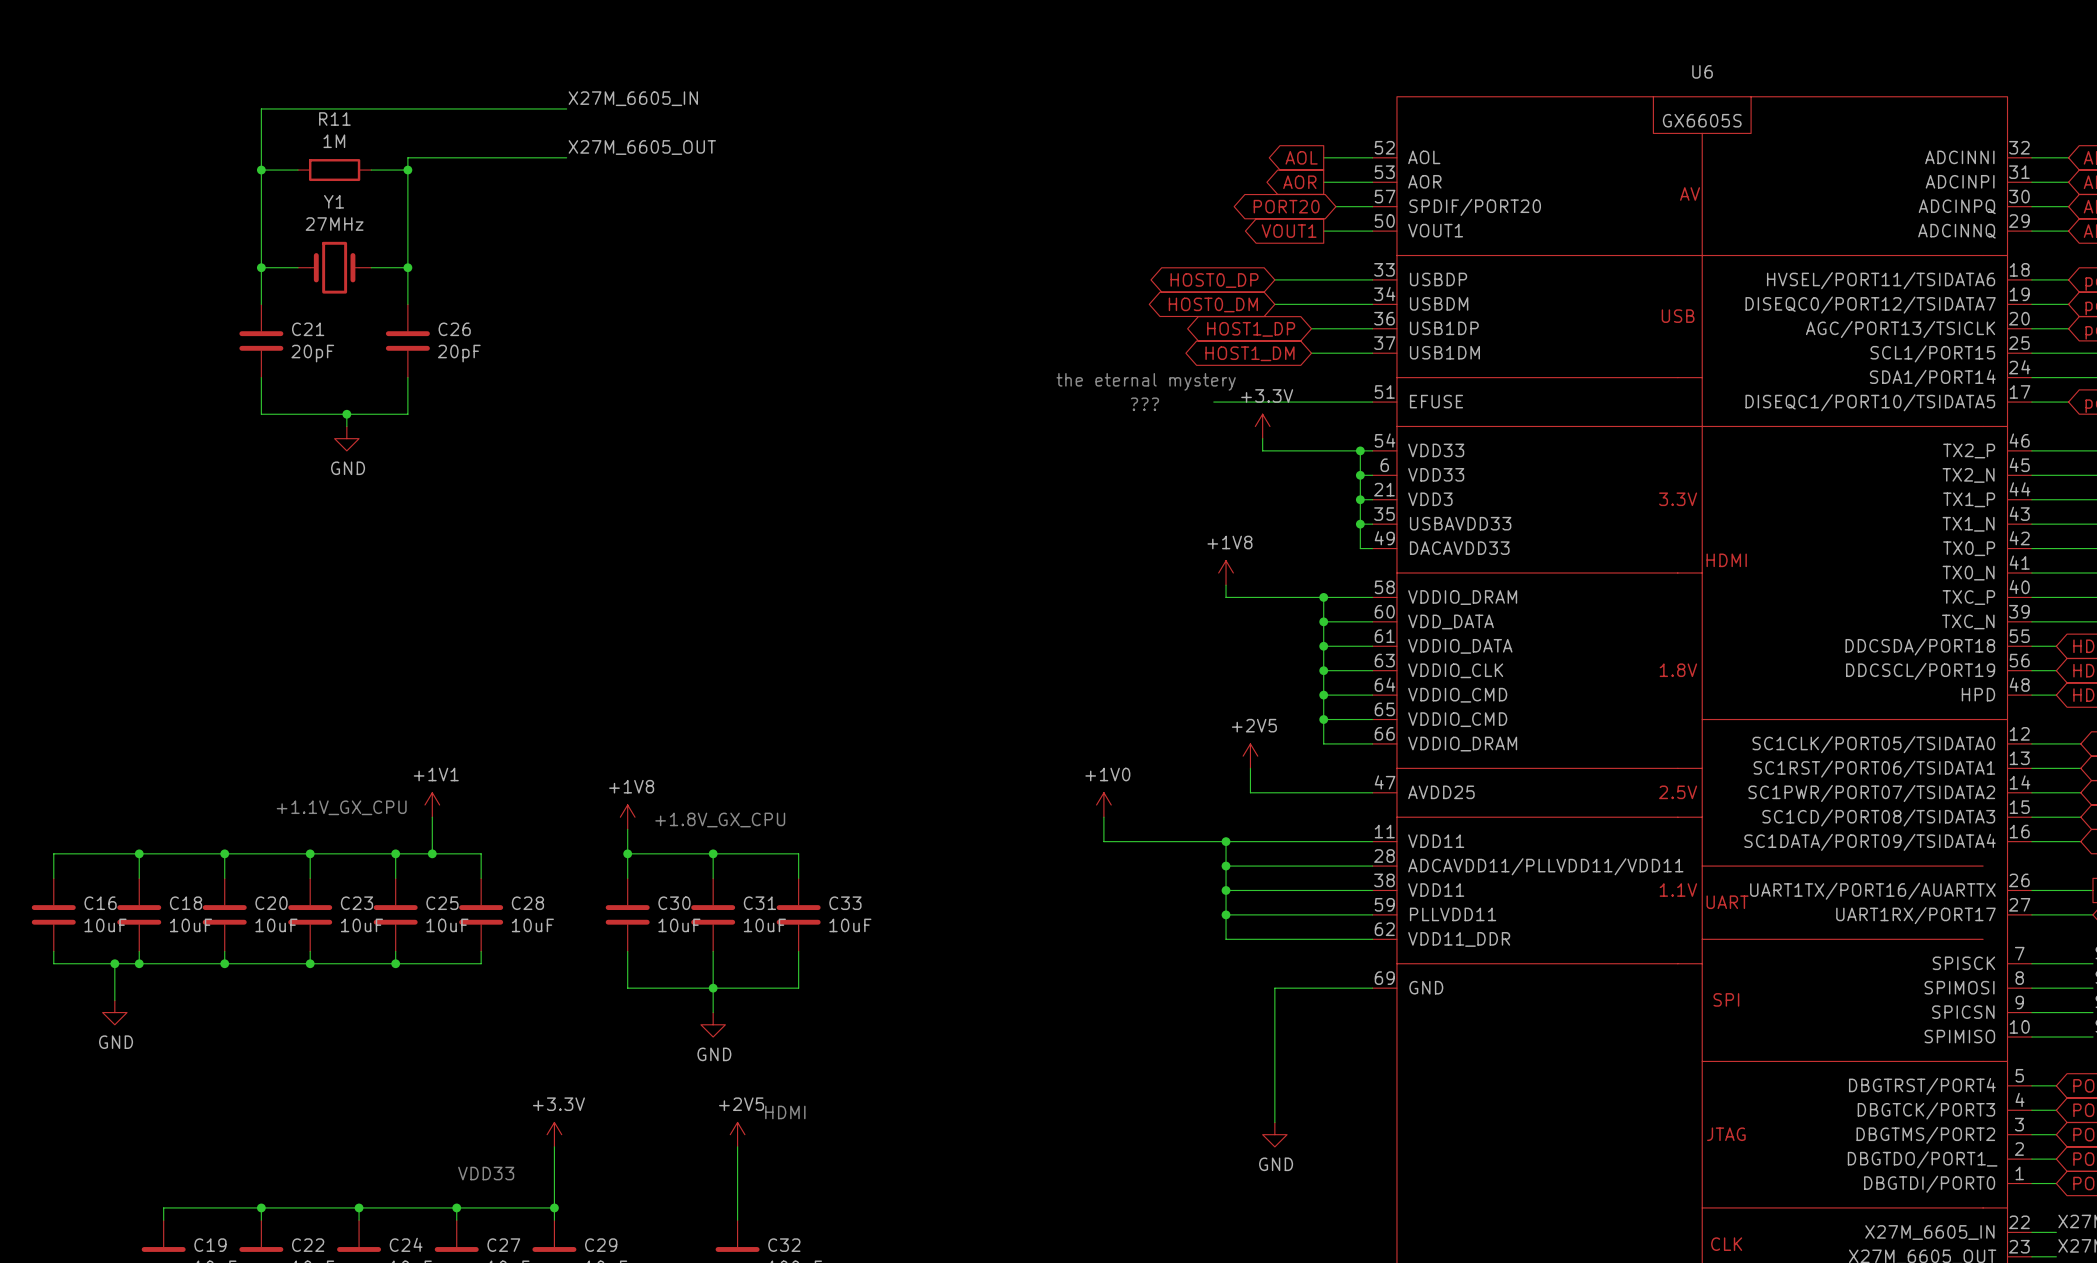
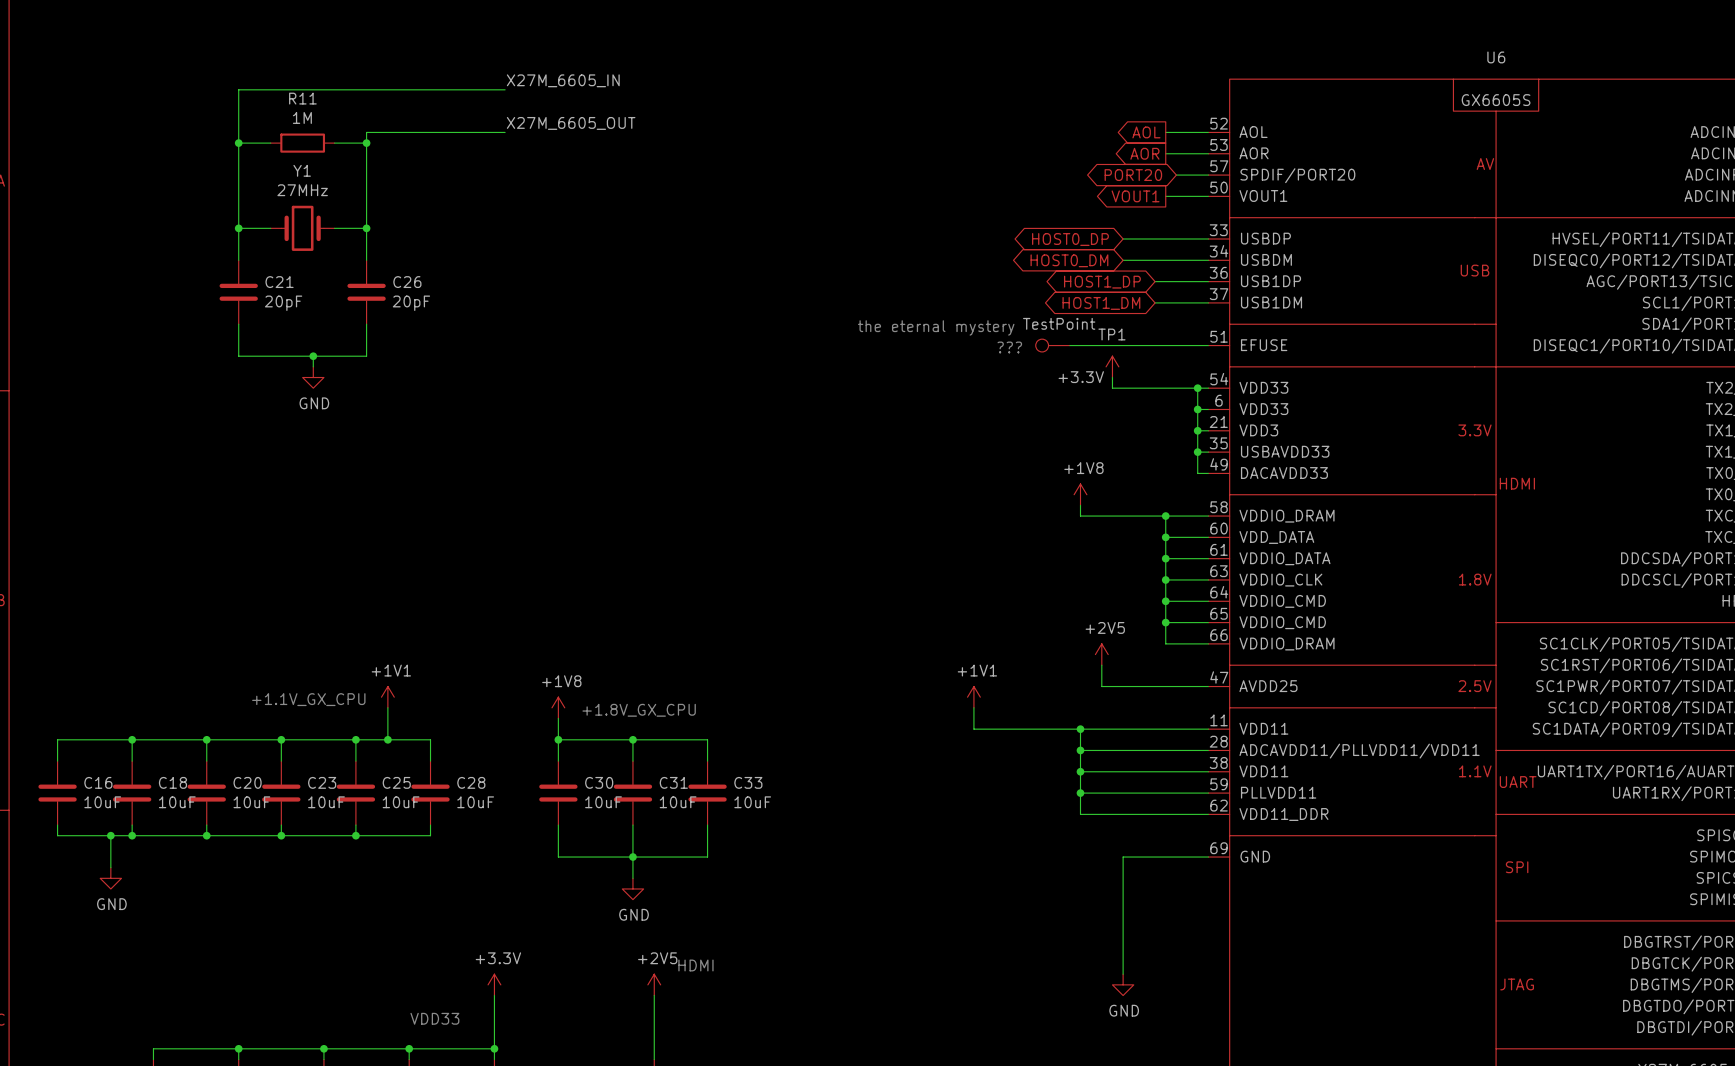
text position: the eternal mystery (1146, 381) -> the eternal mystery (936, 327)
power symbol text position: +3.3V (1267, 395) -> +3.3V (1081, 377)
TP1: none -> TestPoint (1052, 345)
power symbol: +1V0 (1103, 805) -> +1V1 (973, 697)

